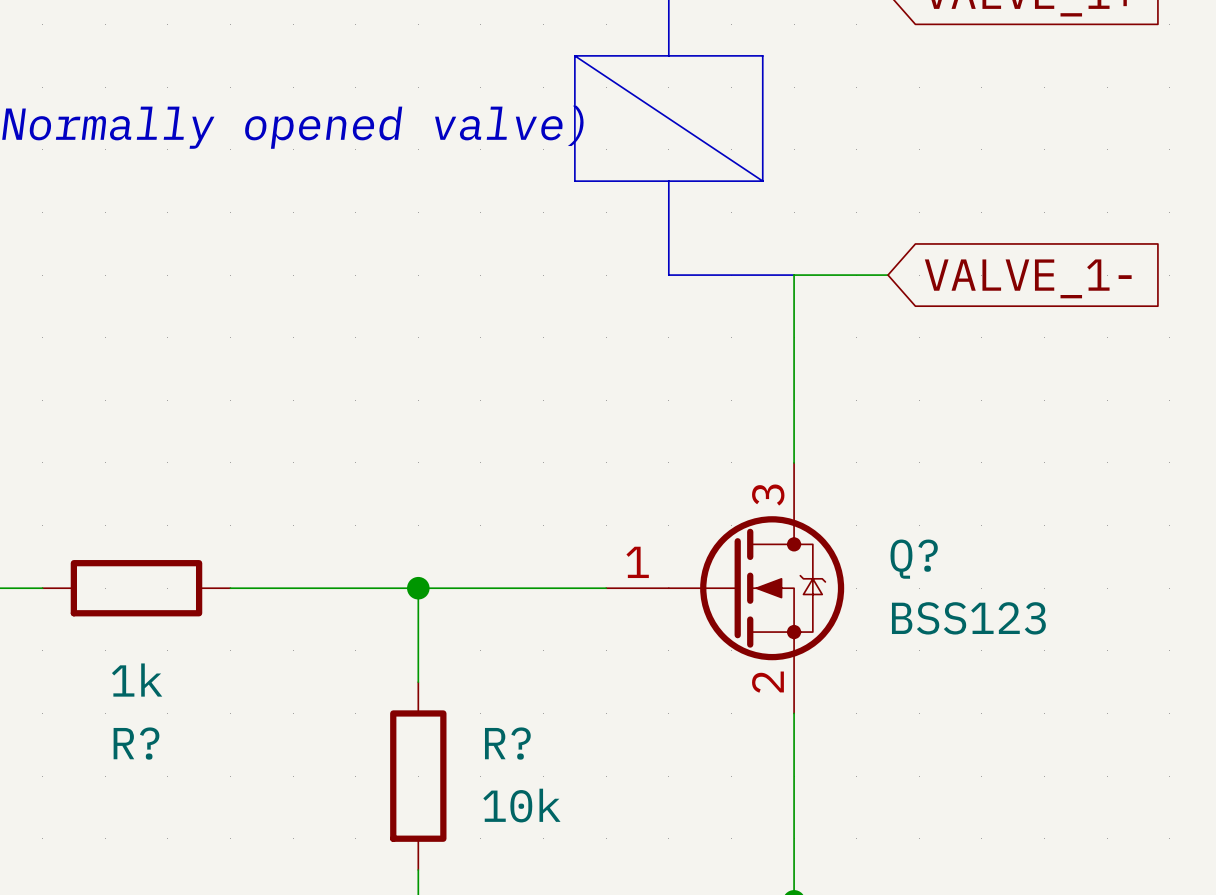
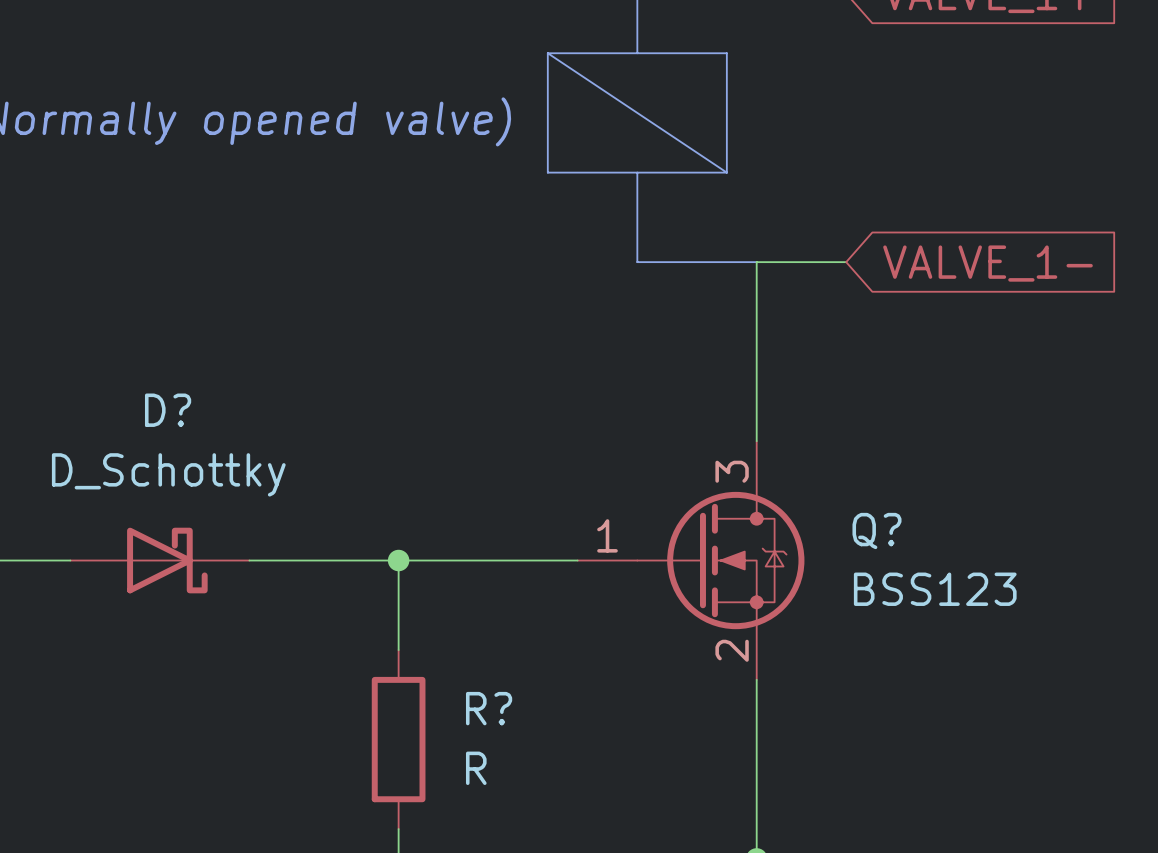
R?: 1k (136, 588) -> none
D?: none -> D_Schottky (159, 560)
R? value: 10k (521, 805) -> R (476, 768)

